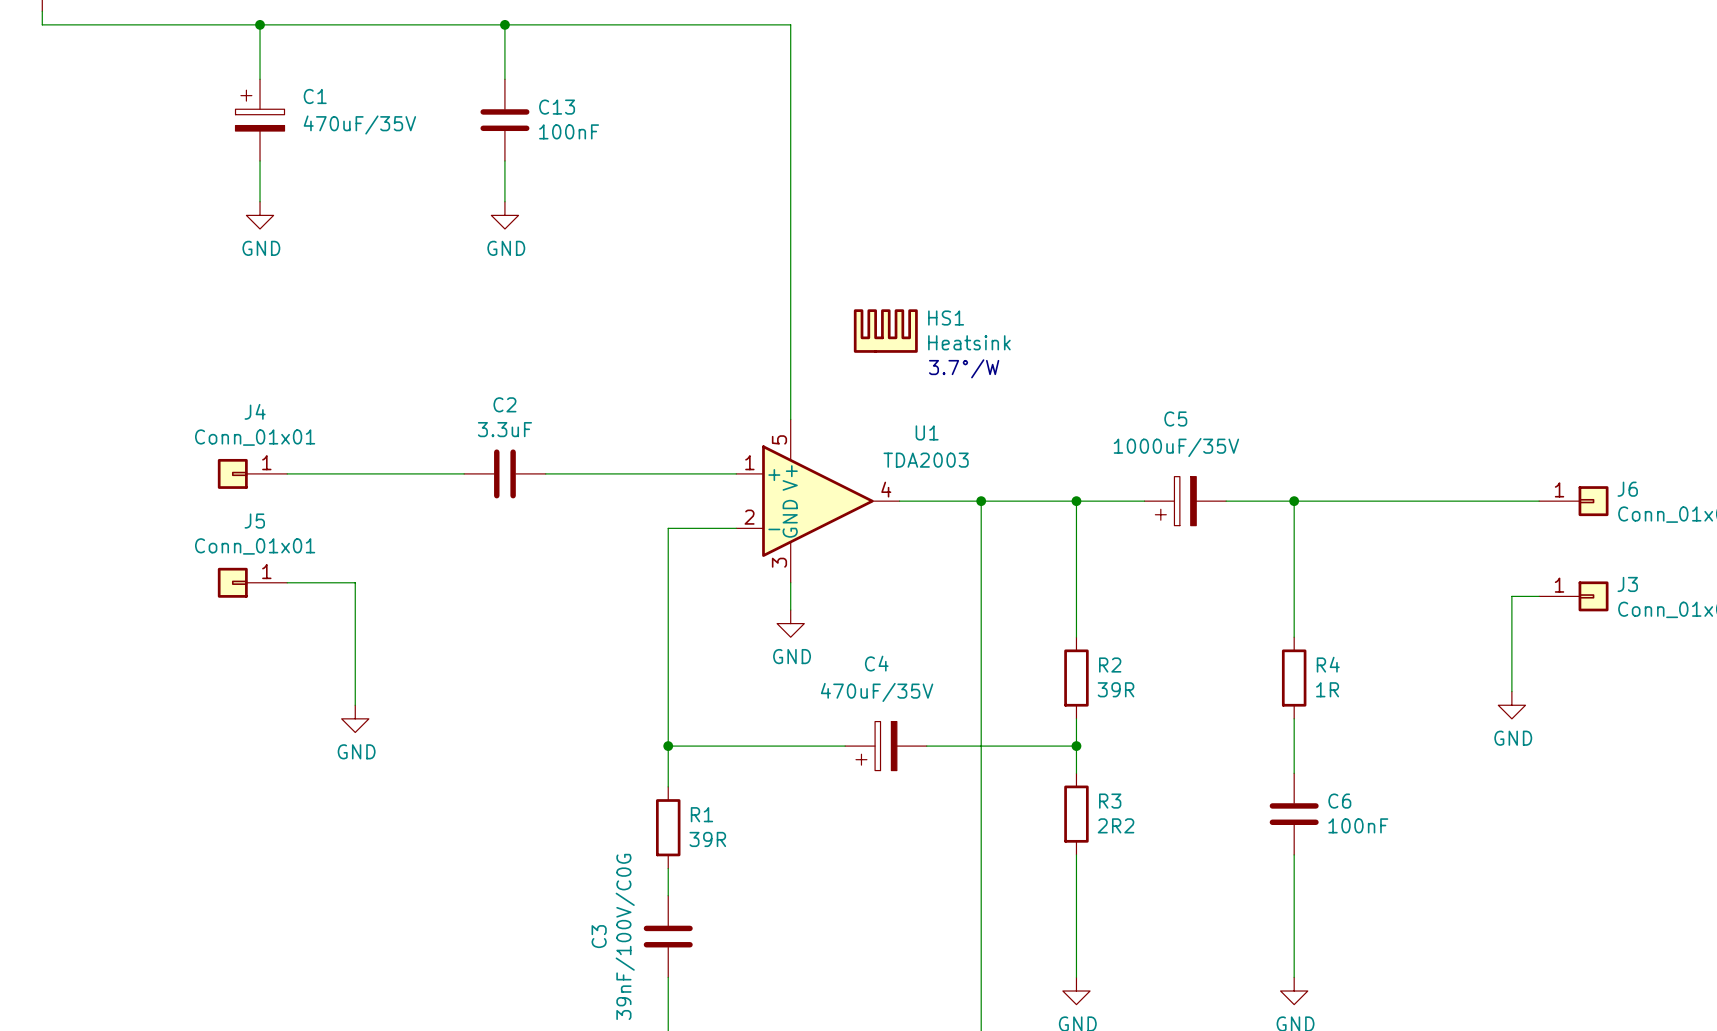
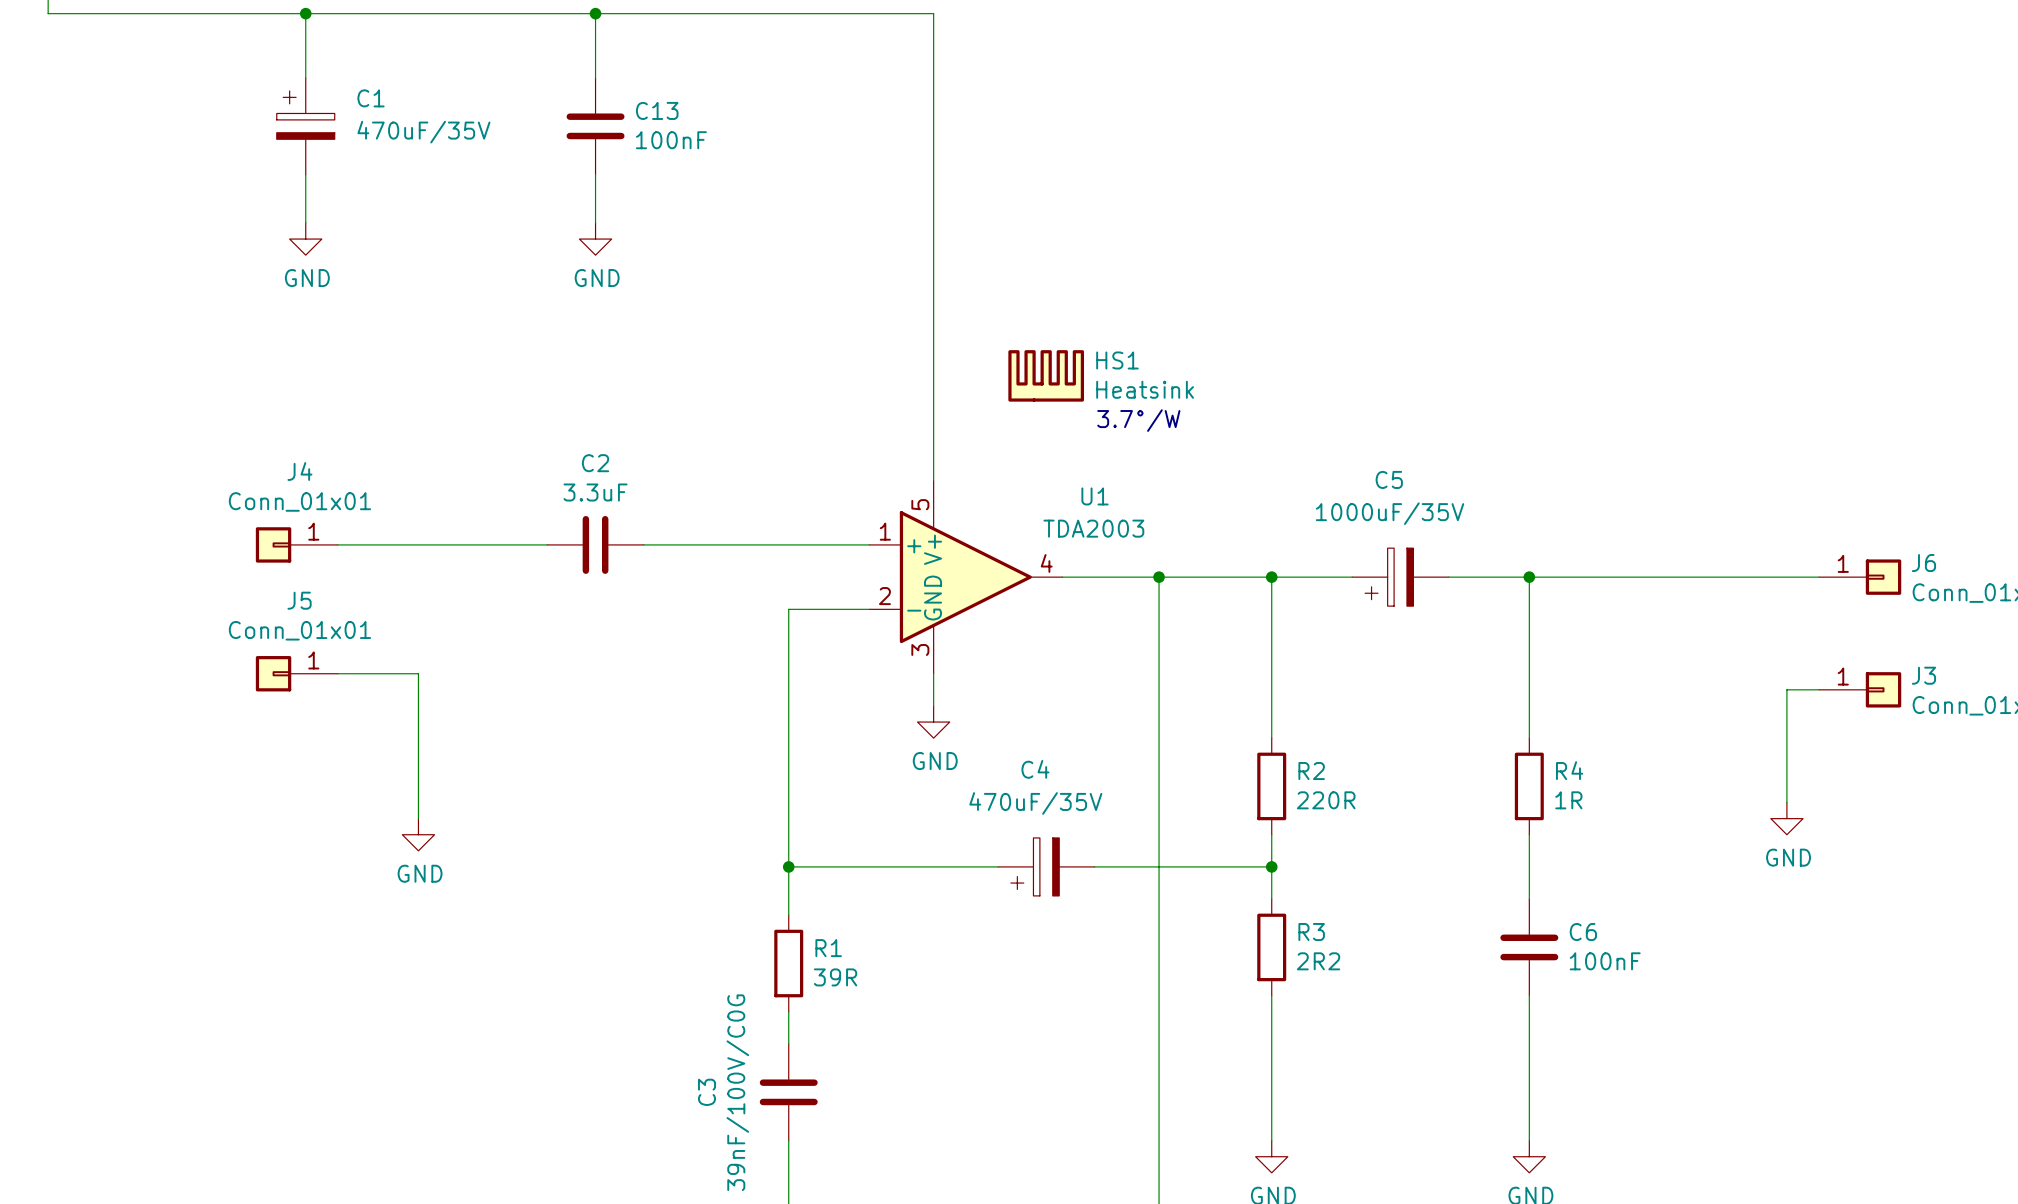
R2 value: 39R (1116, 689) -> 220R (1326, 800)

